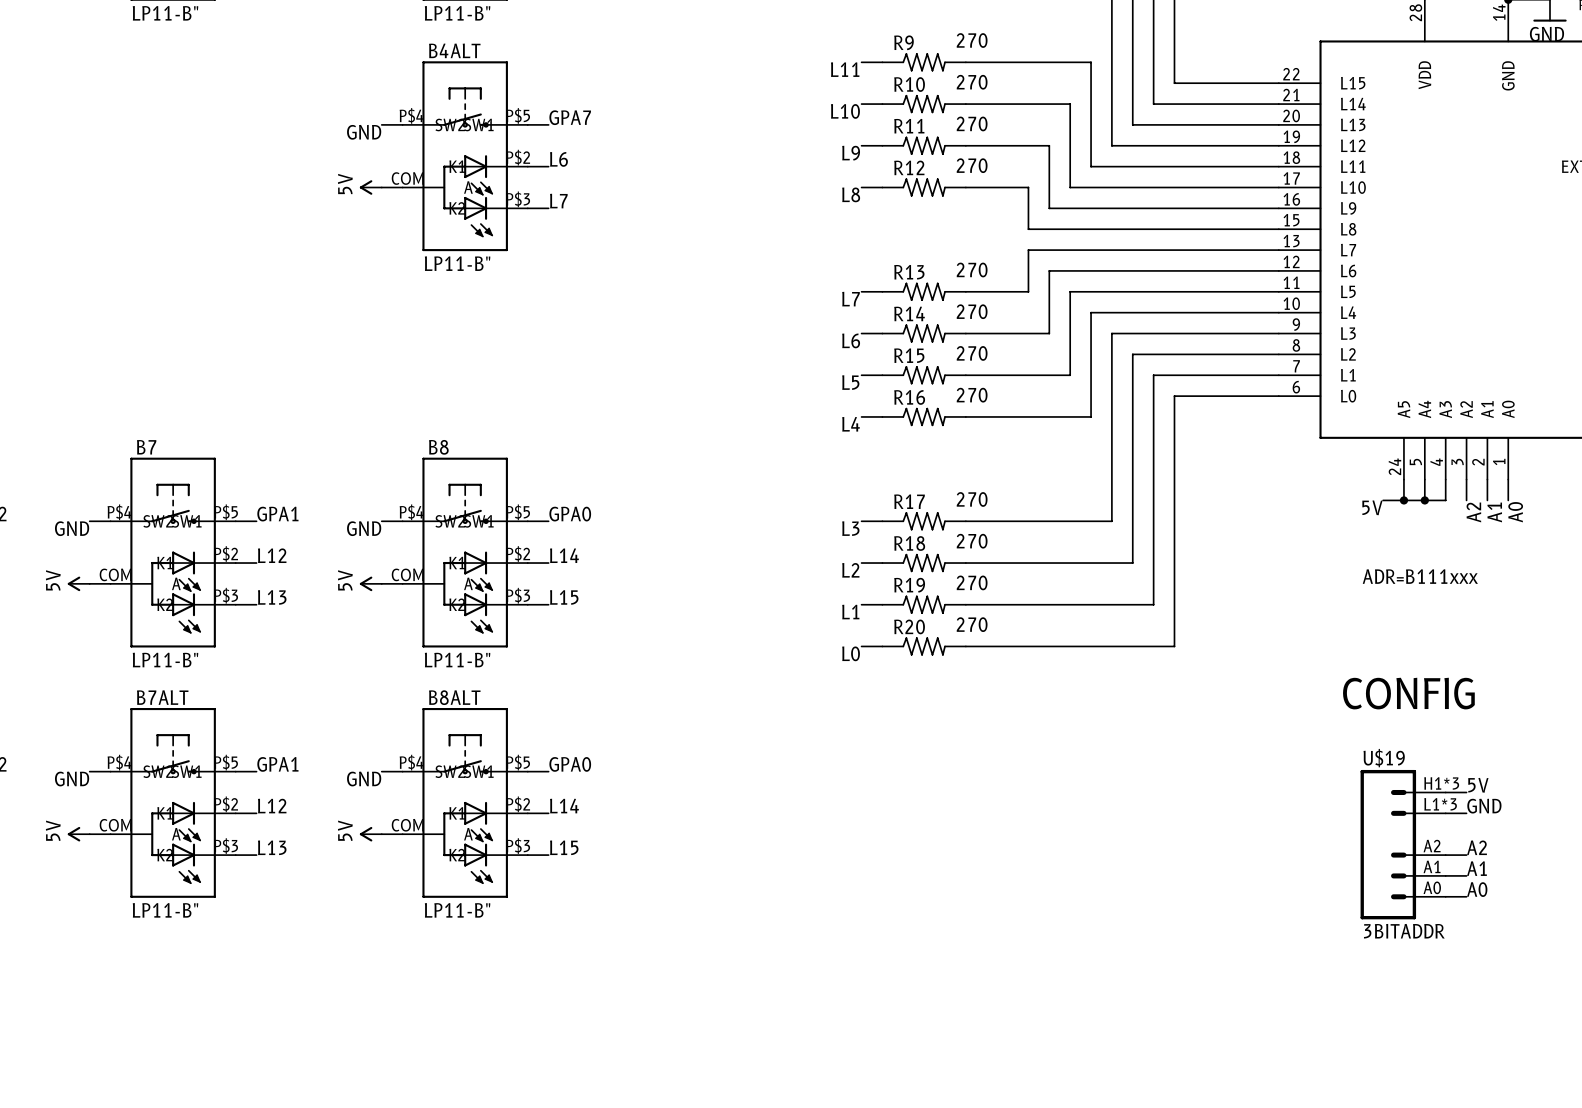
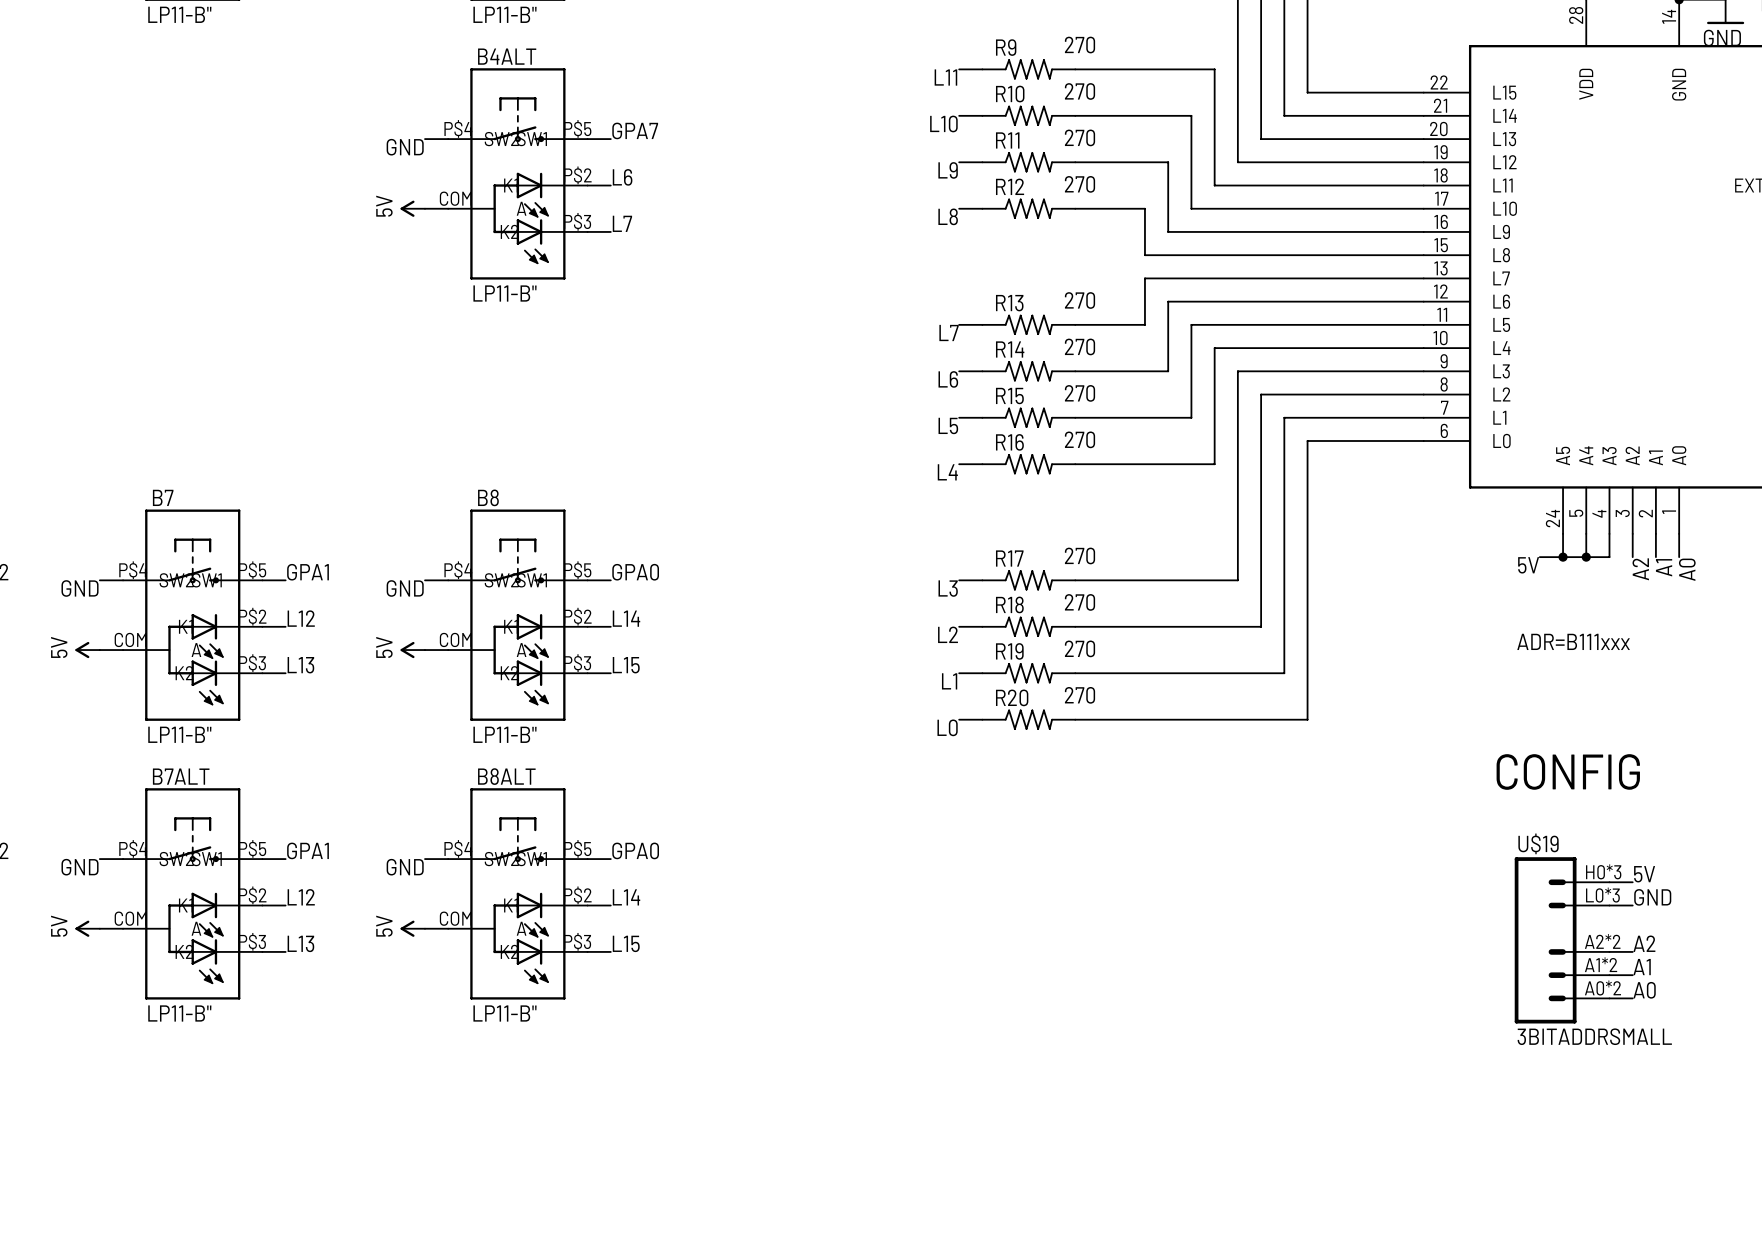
U$19 pin number: H1*3 (1441, 783) -> H0*3 (1603, 871)
U$19 pin number: L1*3 (1440, 804) -> L0*3 (1602, 895)
U$19 pin number: A2 (1432, 846) -> A2*2 (1602, 941)
U$19 pin number: A1 (1432, 866) -> A1*2 (1601, 964)
U$19 pin number: A0 (1432, 887) -> A0*2 (1602, 987)
U$19 value: 3BITADDR (1404, 931) -> 3BITADDRSMALL (1594, 1036)

